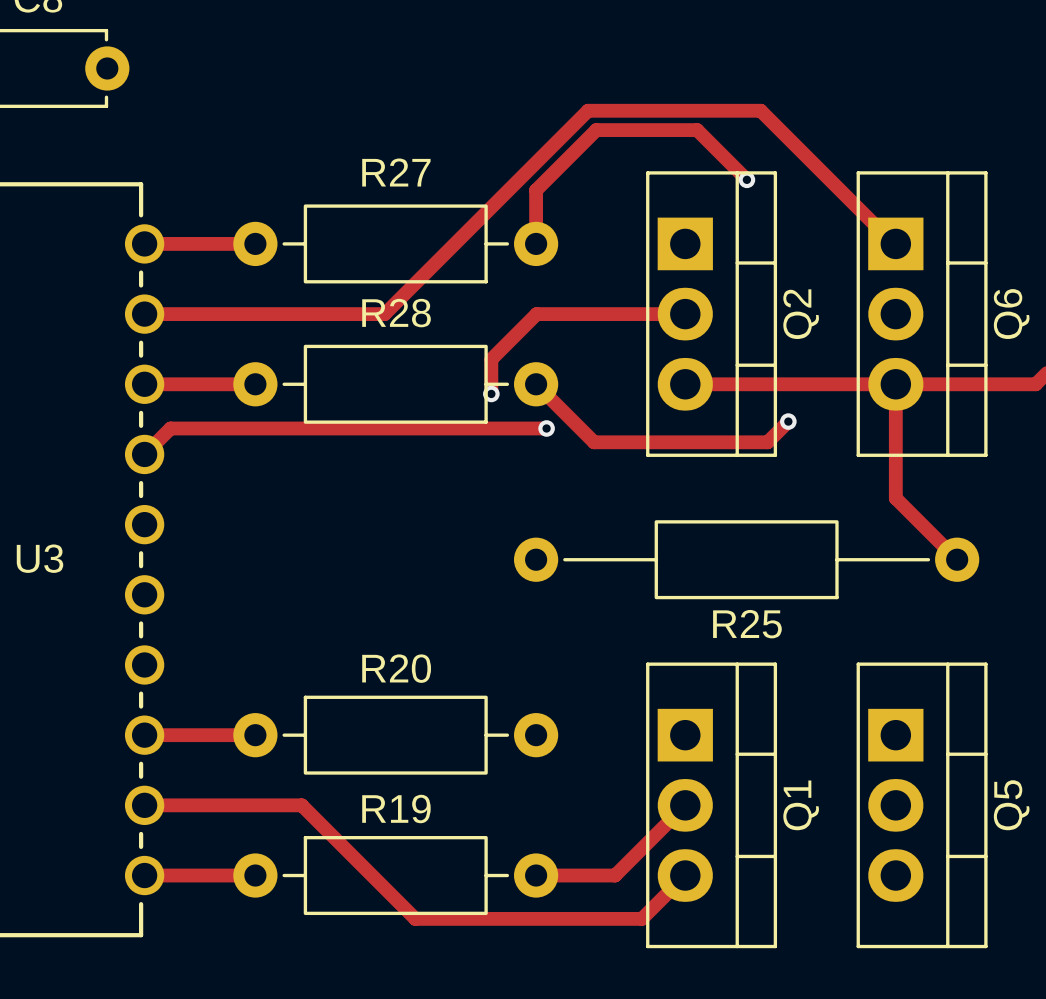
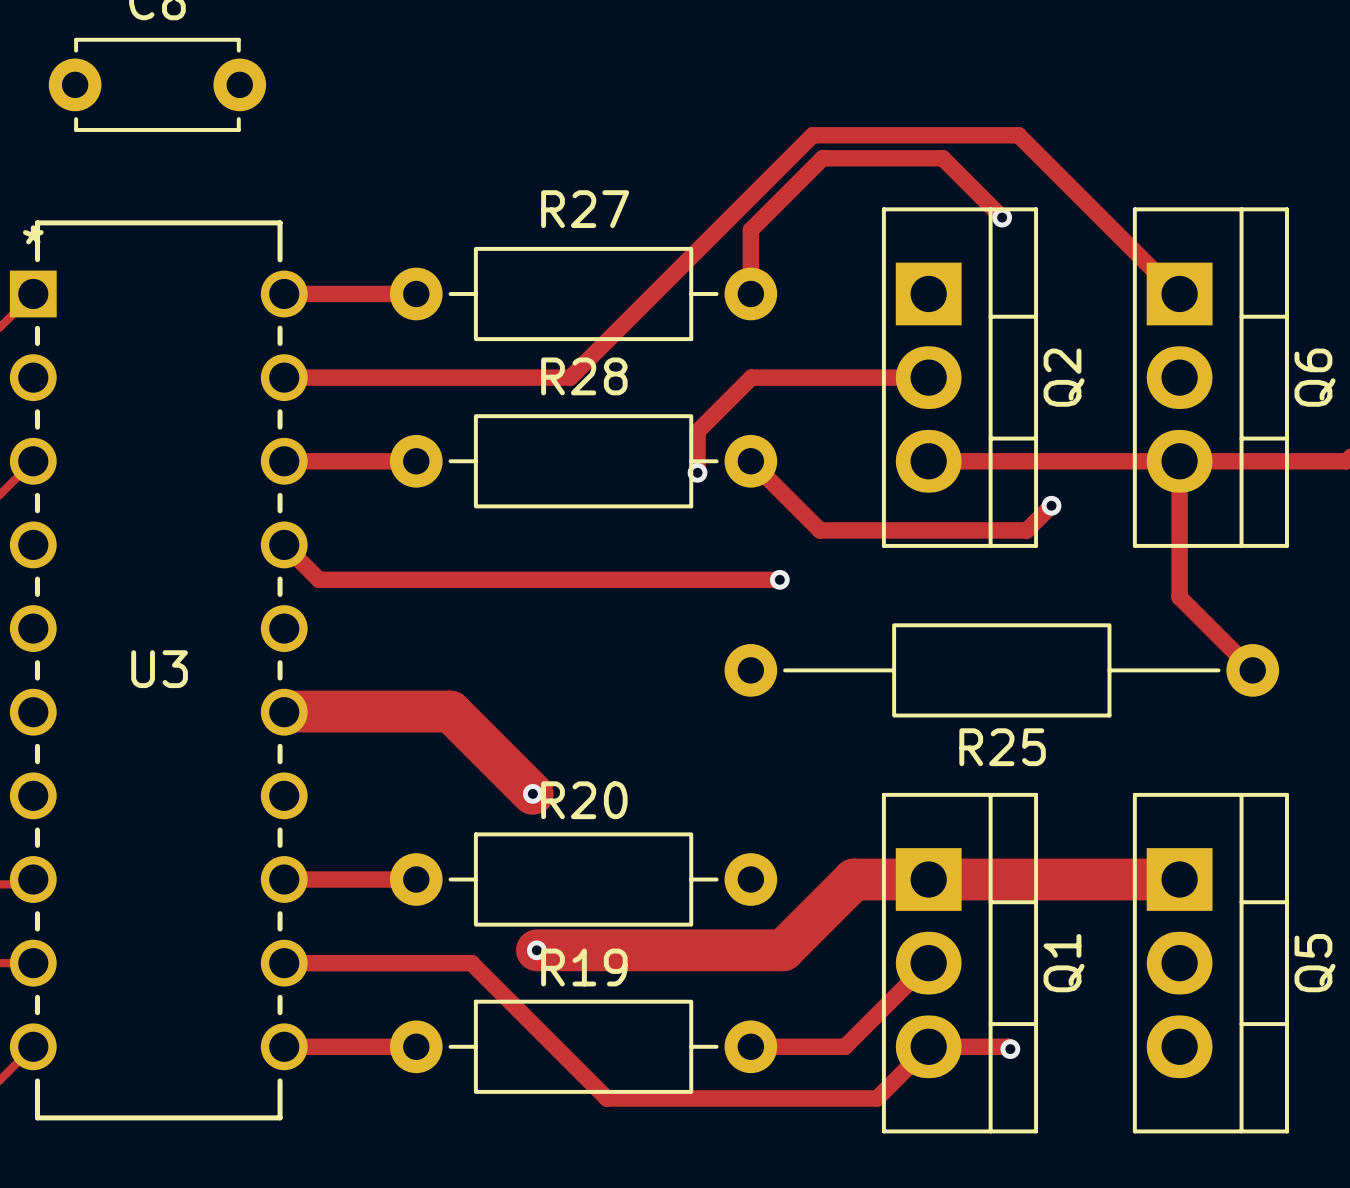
track: (546, 428) (170, 428) (144, 454) -> (779, 579) (319, 579) (284, 544)
via position: (546, 428) -> (779, 579)
track: none -> (284, 711) (450, 711) (532, 793)
via: none -> (532, 793)
track: none -> (1179, 879) (853, 879) (783, 950) (536, 950)
via: none -> (536, 950)
track: none -> (928, 1046) (1008, 1046) (1010, 1049)
via: none -> (1010, 1049)

